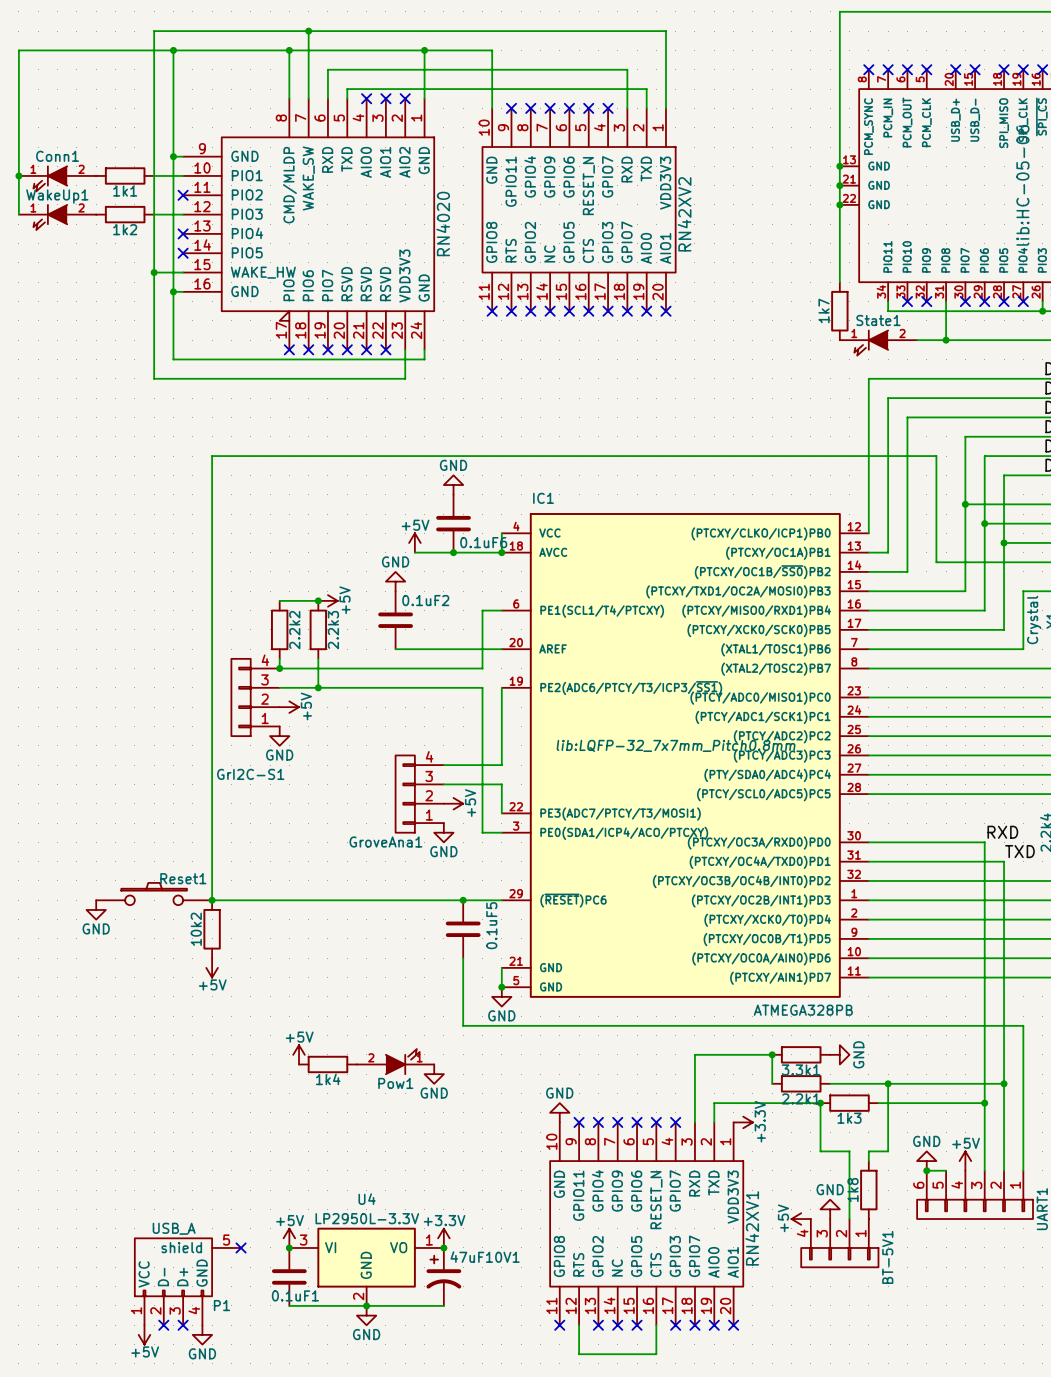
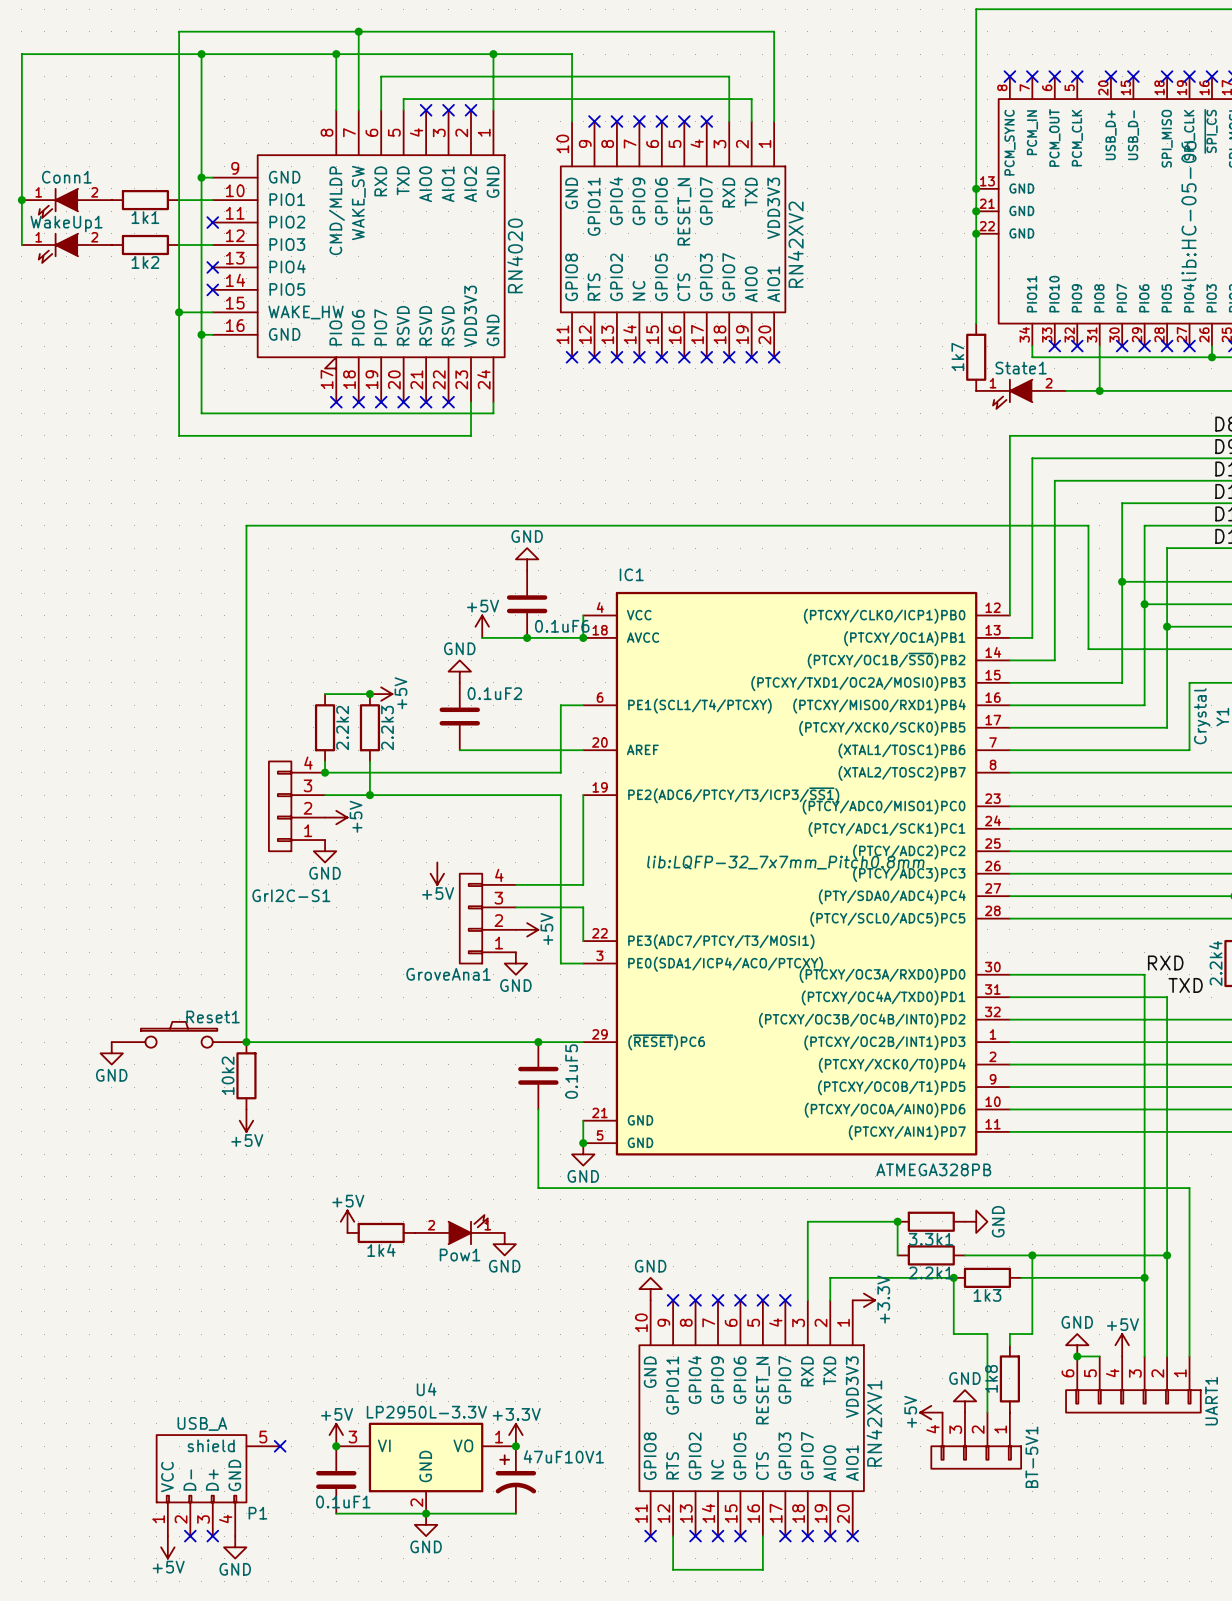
power symbol: none -> +5V (437, 873)

